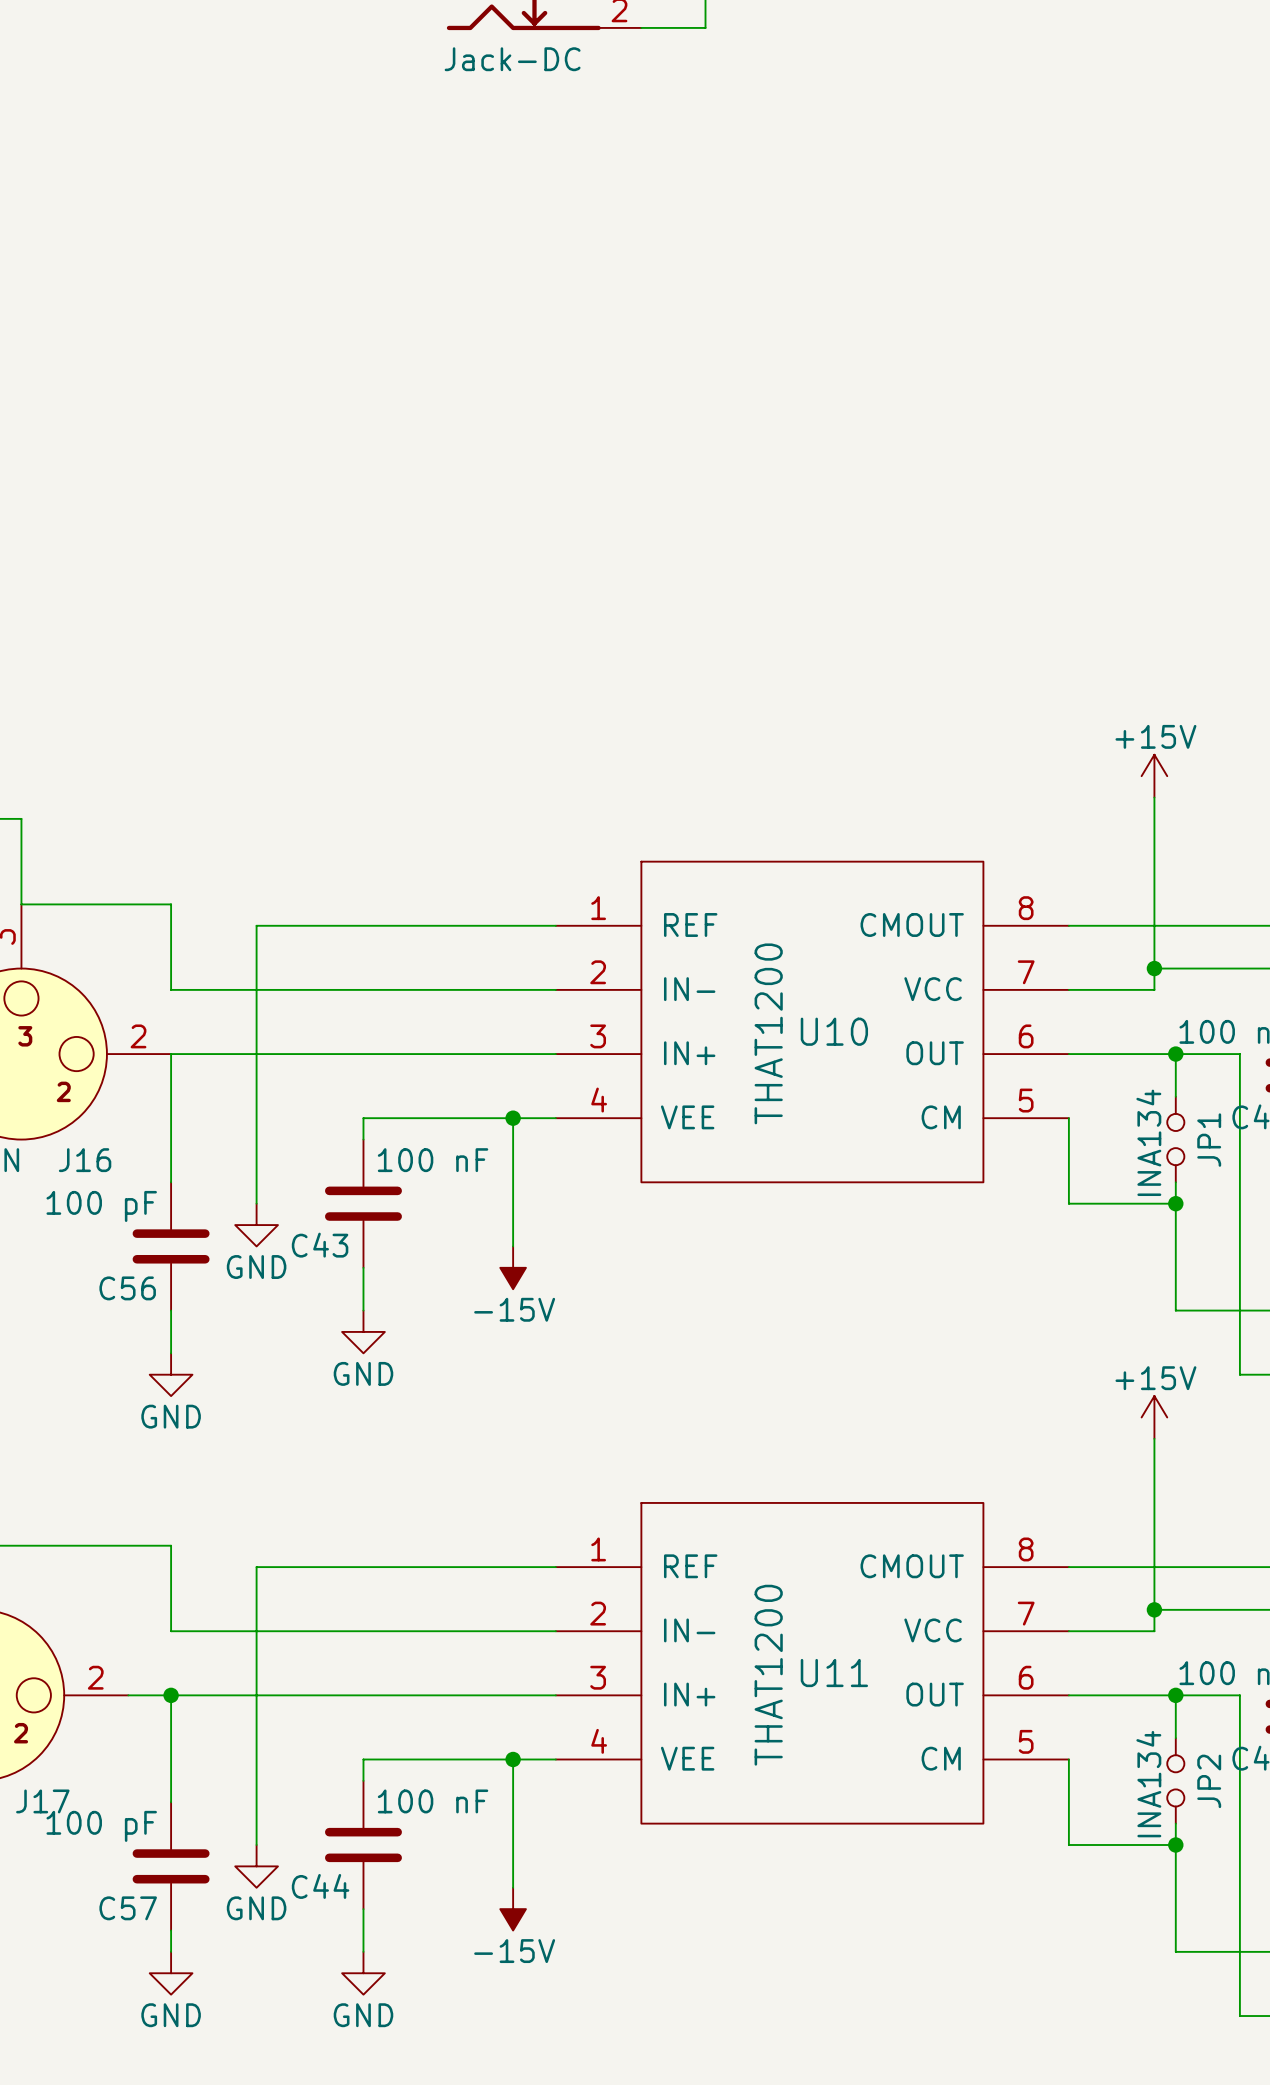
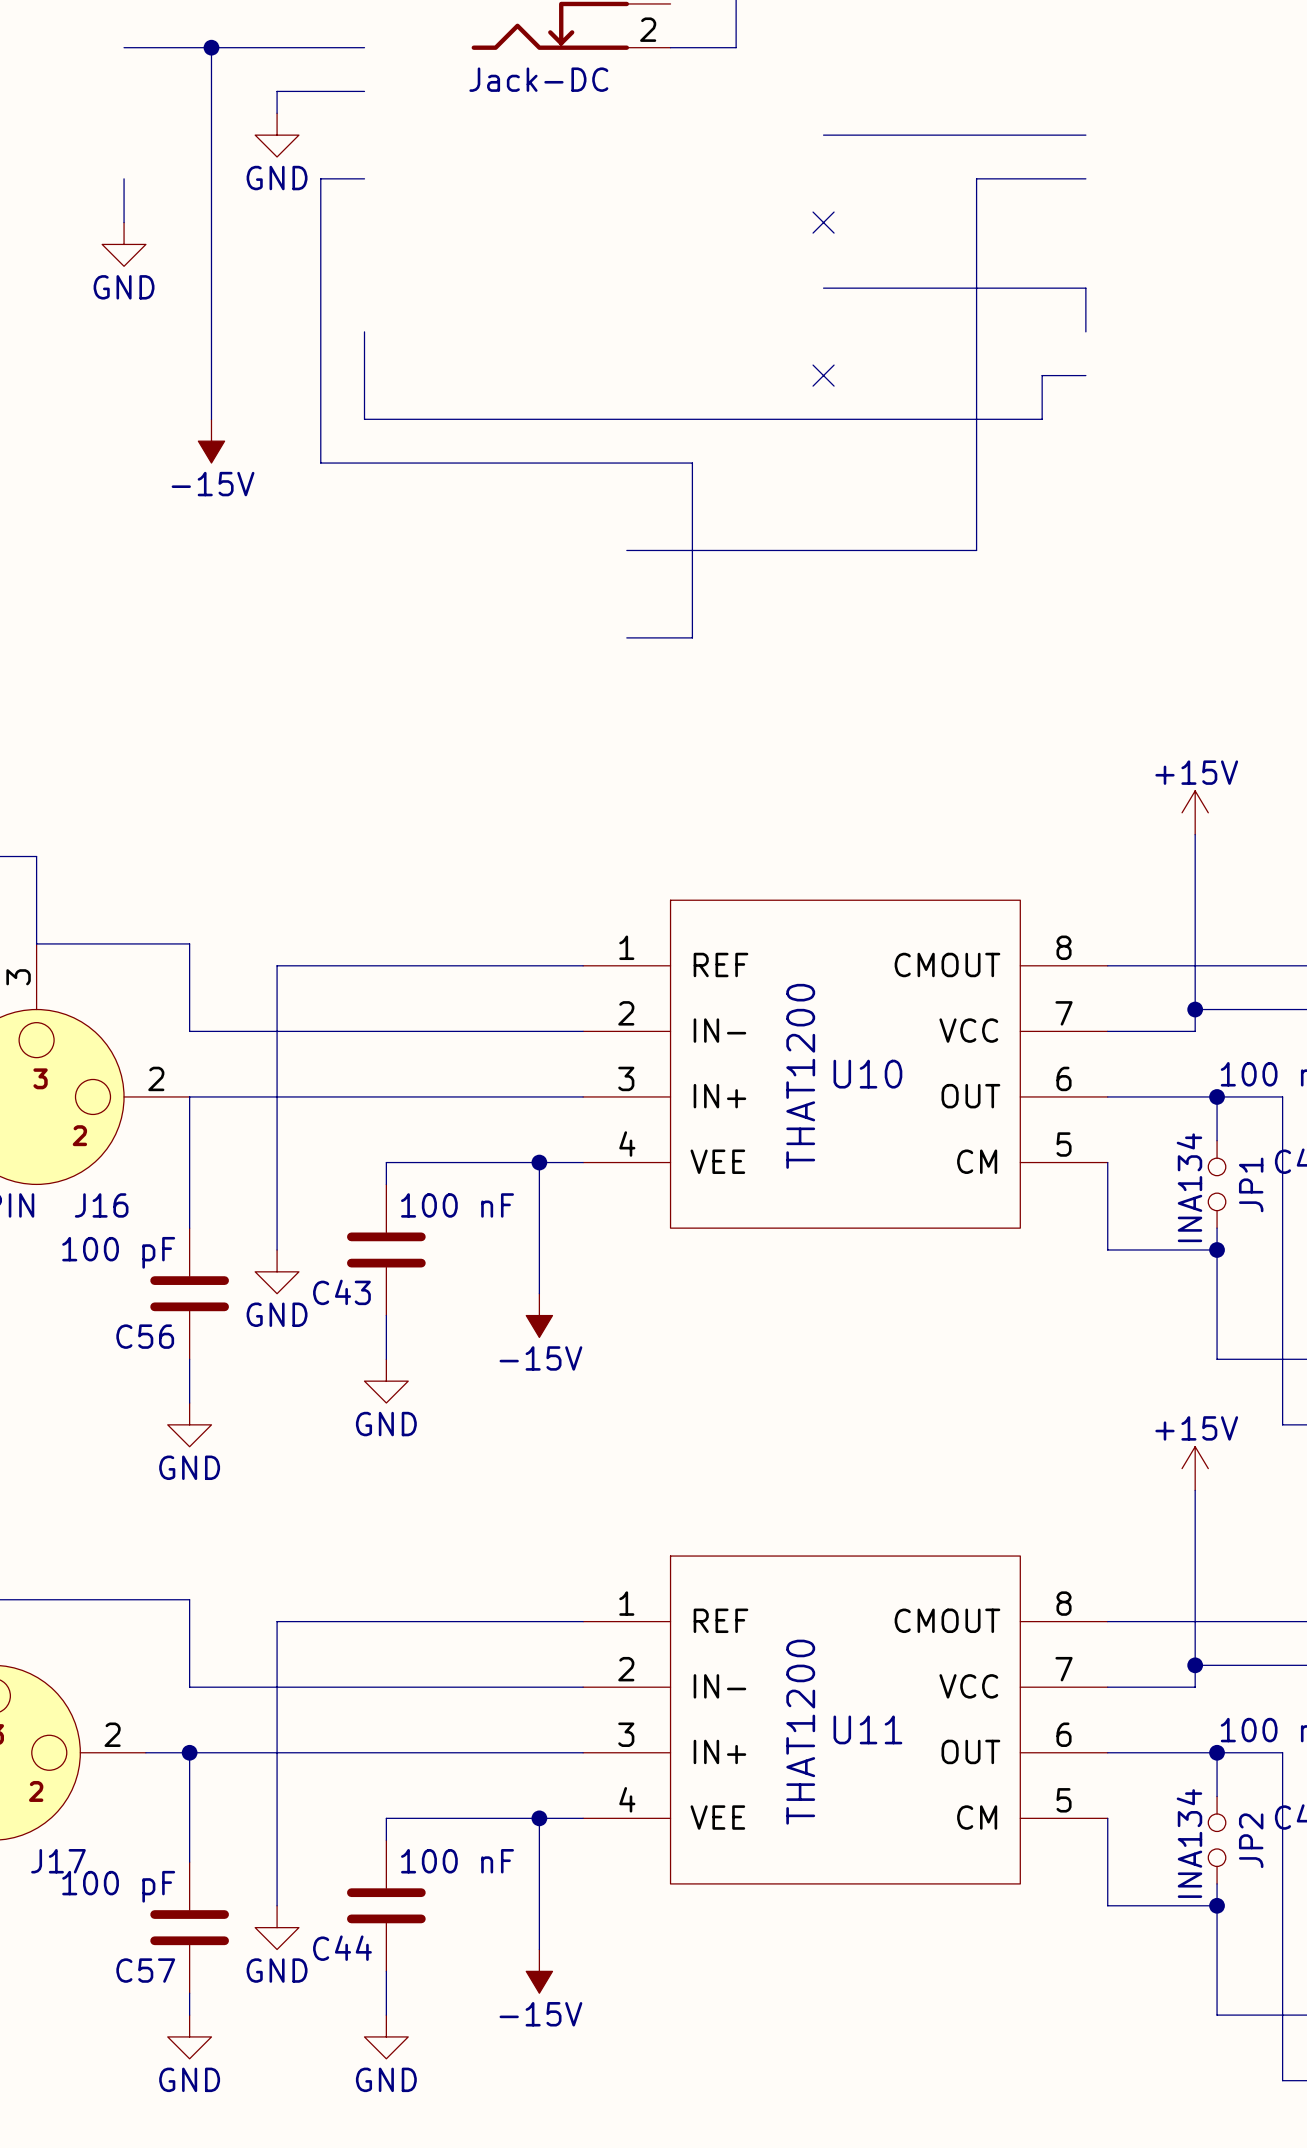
wire: none -> (124, 47) (364, 47)
wire: none -> (211, 47) (211, 419)
junction: none -> (211, 47)
wire: none -> (364, 91) (277, 91) (277, 113)
power symbol: none -> GND (277, 135)
wire: none -> (823, 135) (1085, 135)
wire: none -> (124, 178) (124, 222)
wire: none -> (364, 178) (320, 178) (320, 463) (692, 463) (692, 637) (626, 637)
wire: none -> (1085, 178) (976, 178) (976, 550) (626, 550)
no-connect mark: none -> (823, 222)
power symbol: none -> GND (124, 244)
wire: none -> (823, 288) (1085, 288) (1085, 331)
wire: none -> (364, 331) (364, 419) (1042, 419) (1042, 375) (1085, 375)
no-connect mark: none -> (823, 375)
power symbol: none -> -15V (211, 441)

